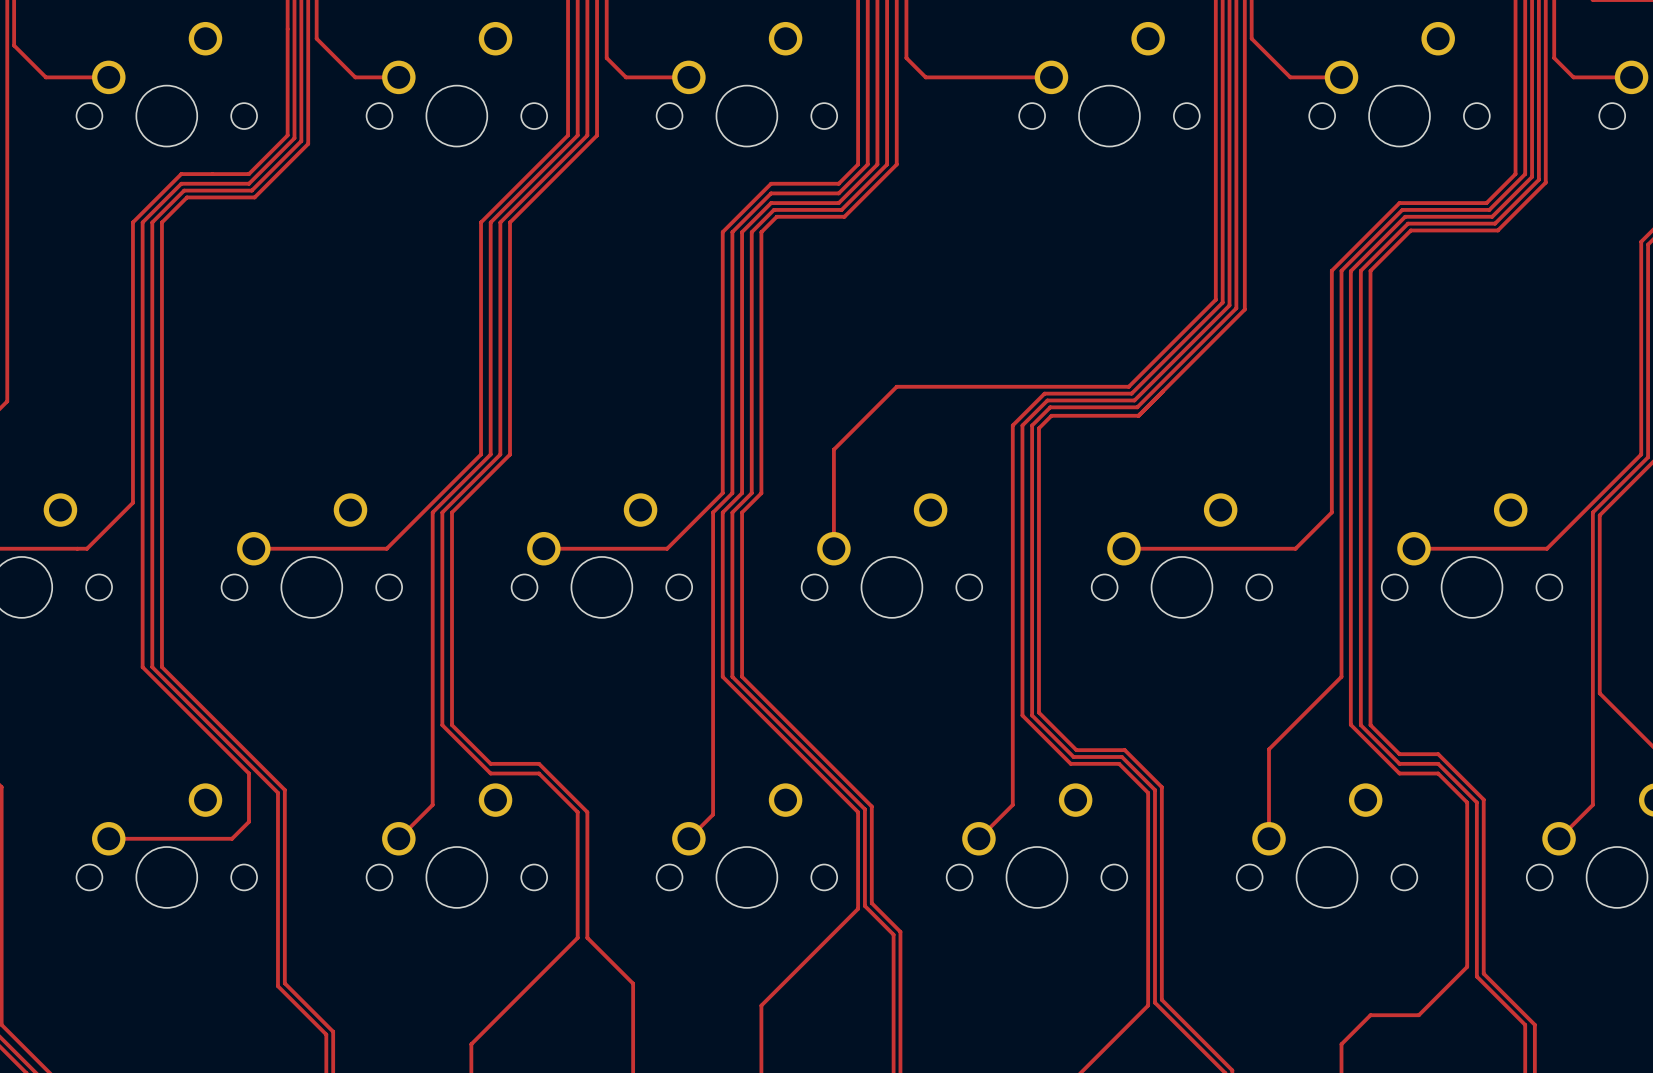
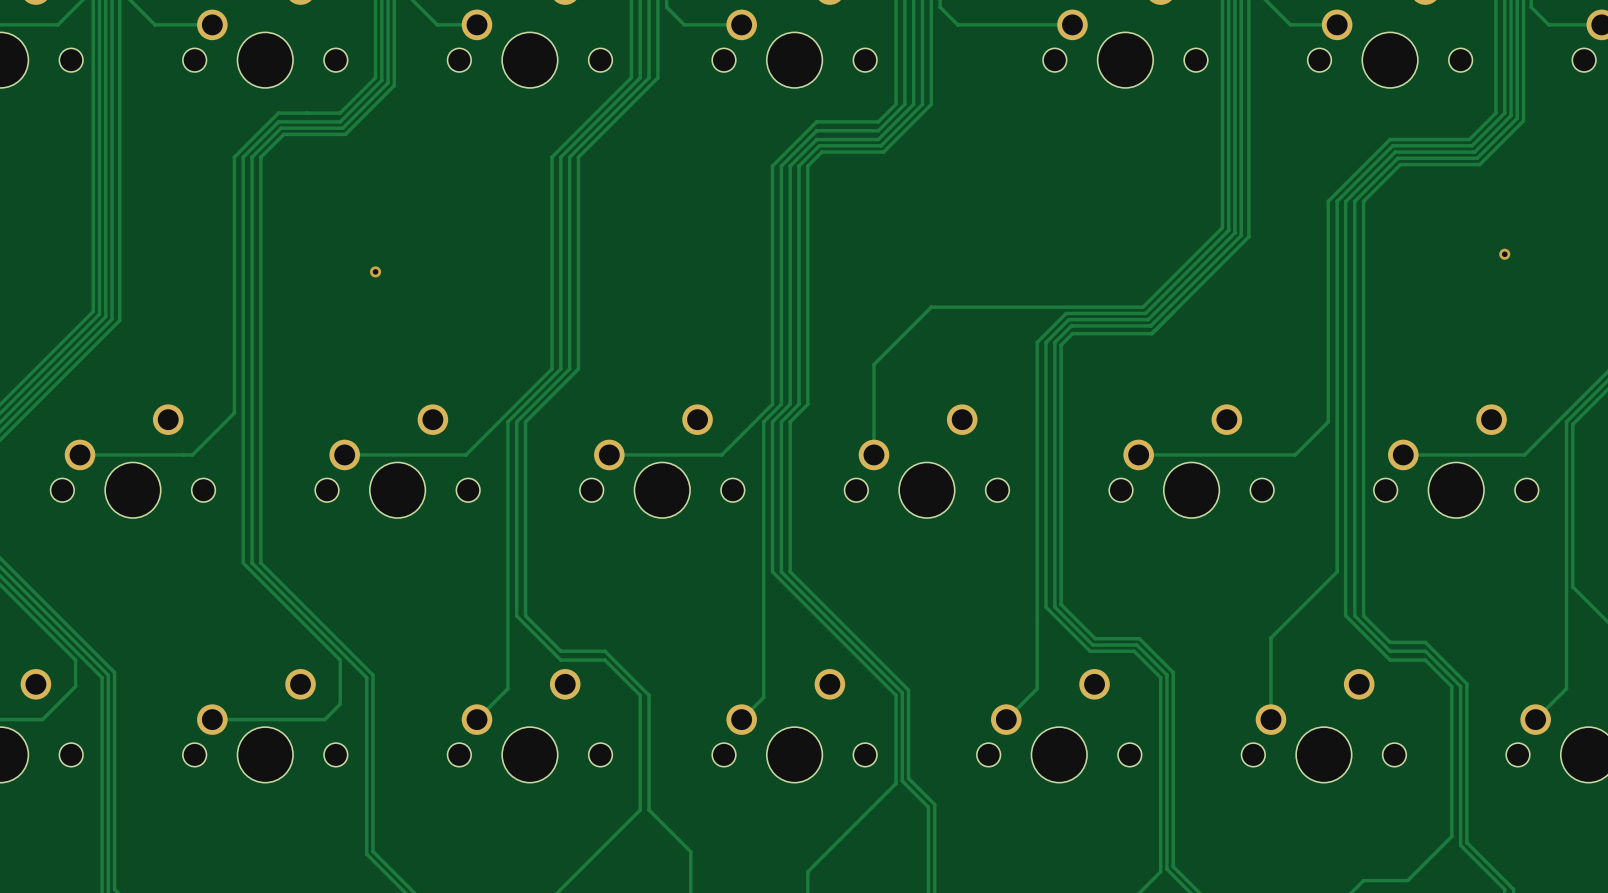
via: none -> (1504, 254)
via: none -> (375, 271)

